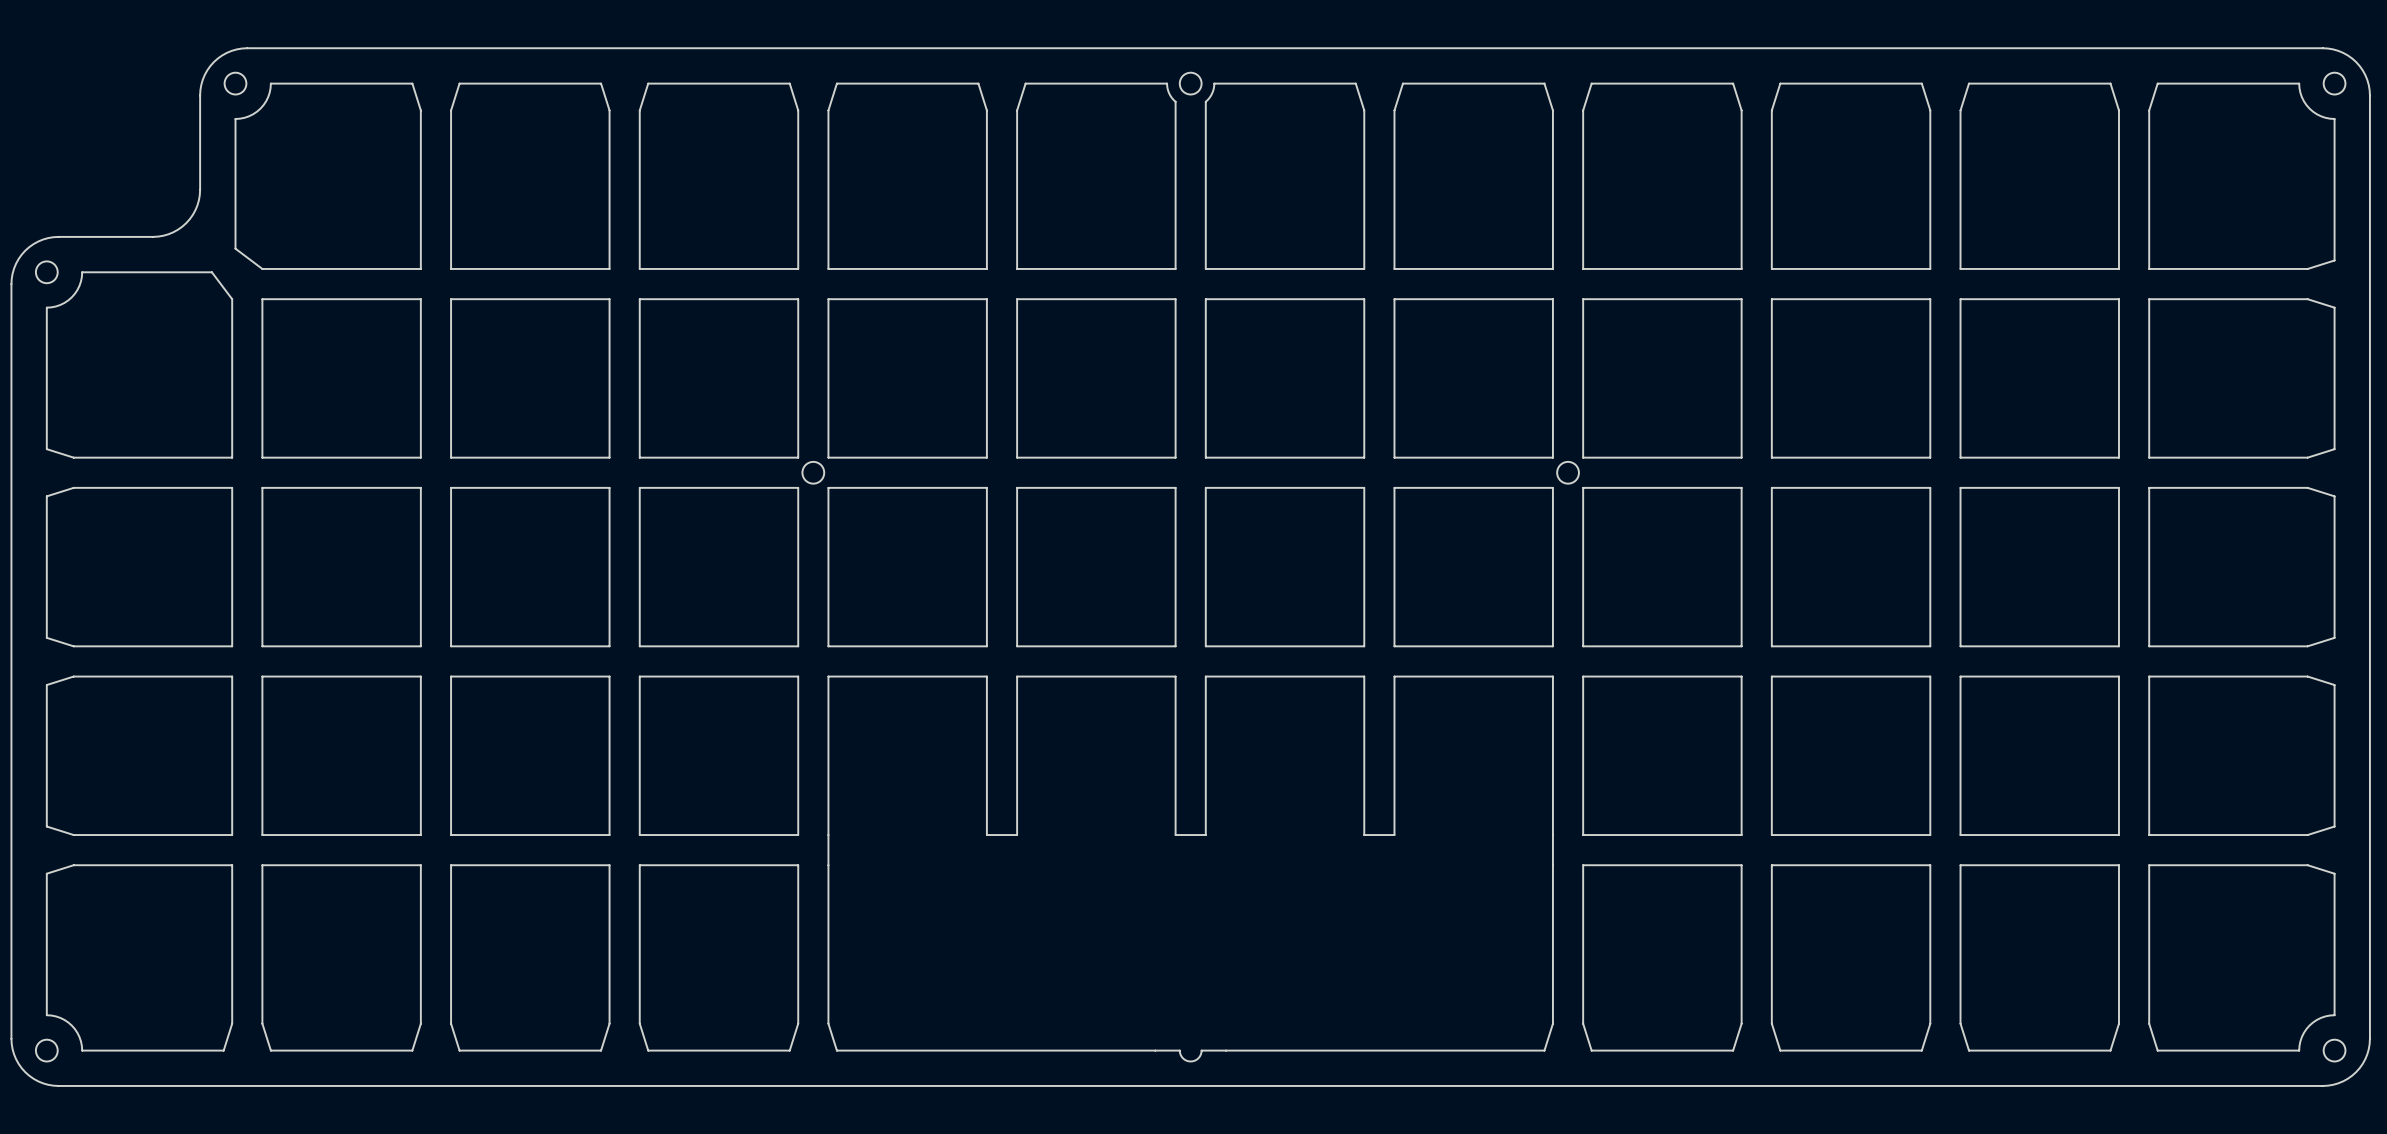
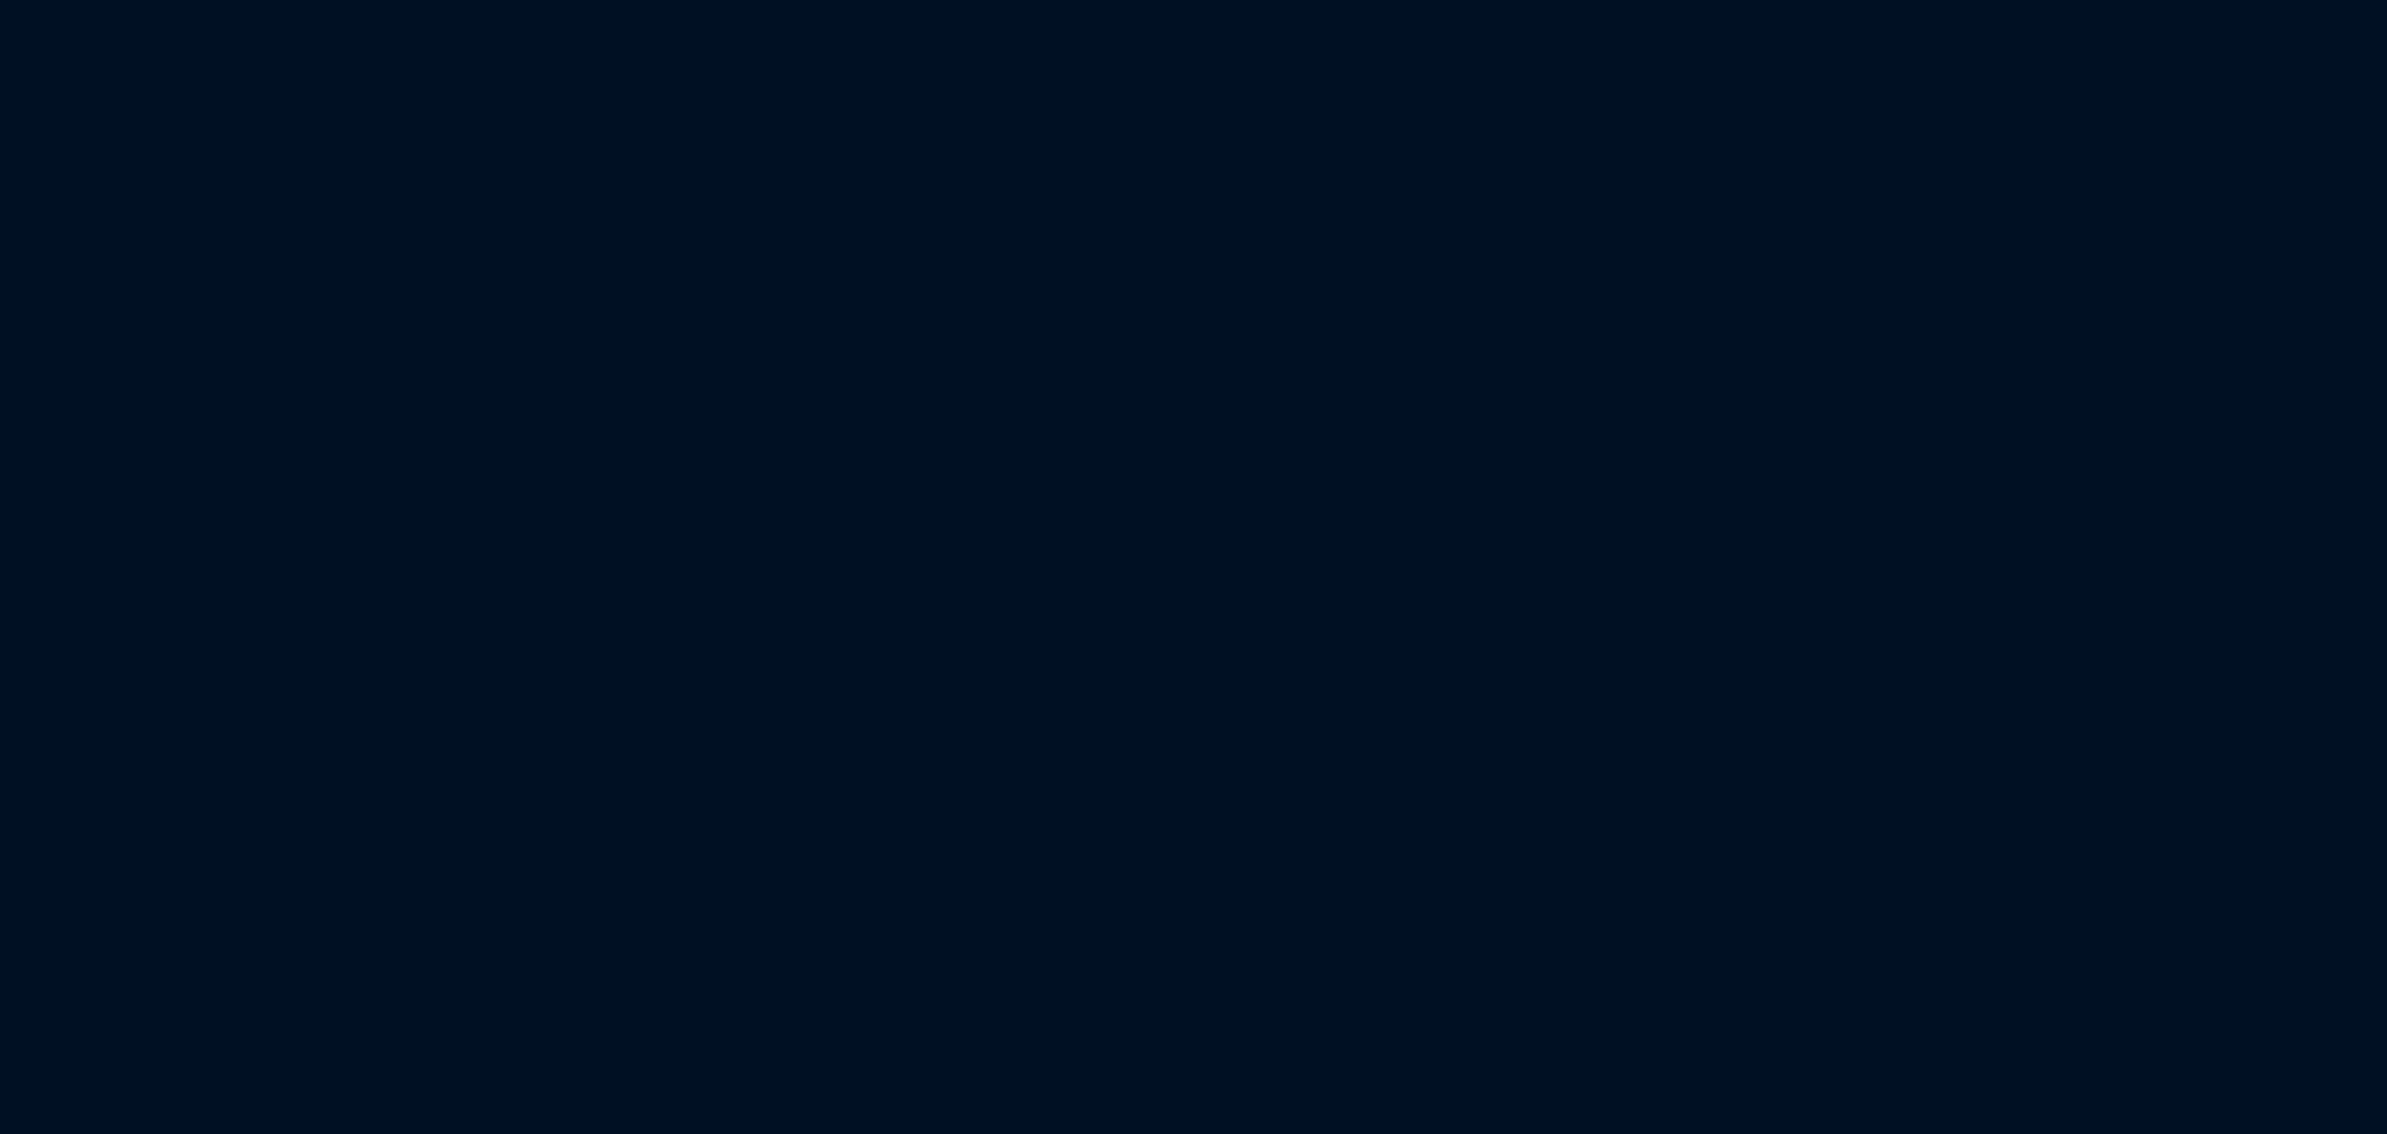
board edge: (2322, 48) (247, 48) (226, 52) (210, 65) (201, 84) (199, 195) (195, 210) (186, 223) (173, 232) (158, 236) (58, 236) (43, 239) (25, 250) (16, 263) (12, 273) (11, 1038) (16, 1059) (25, 1072) (33, 1078) (43, 1083) (58, 1085) (2322, 1085) (2343, 1081) (2356, 1072) (2362, 1063) (2368, 1049) (2369, 1038) (2369, 95) (2367, 79) (2356, 62) (2343, 52) (2322, 48) -> none
round board edge: [224, 72, 247, 95] -> none
round board edge: [1179, 72, 1202, 95] -> none
round board edge: [2323, 72, 2346, 95] -> none
board edge: (412, 83) (270, 83) (268, 97) (260, 108) (249, 116) (235, 118) (235, 248) (262, 268) (420, 268) (420, 110) (412, 83) -> none
board edge: (601, 83) (609, 110) (609, 268) (451, 268) (451, 110) (459, 83) (601, 83) -> none
board edge: (789, 83) (648, 83) (639, 110) (639, 268) (798, 268) (798, 110) (789, 83) -> none
board edge: (978, 83) (836, 83) (828, 110) (828, 268) (986, 268) (986, 110) (978, 83) -> none
board edge: (1167, 83) (1025, 83) (1017, 110) (1017, 268) (1175, 268) (1175, 101) (1169, 93) (1167, 83) -> none
board edge: (1355, 83) (1214, 83) (1212, 93) (1205, 101) (1205, 268) (1364, 268) (1364, 110) (1355, 83) -> none
board edge: (1544, 83) (1402, 83) (1394, 110) (1394, 268) (1552, 268) (1552, 110) (1544, 83) -> none
board edge: (1733, 83) (1591, 83) (1583, 110) (1583, 268) (1741, 268) (1741, 110) (1733, 83) -> none
board edge: (1921, 83) (1780, 83) (1771, 110) (1771, 268) (1930, 268) (1930, 110) (1921, 83) -> none
board edge: (2110, 83) (1969, 83) (1960, 110) (1960, 268) (2118, 268) (2118, 110) (2110, 83) -> none
board edge: (2299, 83) (2157, 83) (2149, 110) (2149, 268) (2307, 268) (2334, 260) (2334, 118) (2321, 116) (2309, 108) (2301, 97) (2299, 83) -> none
round board edge: [35, 261, 58, 284] -> none
board edge: (211, 272) (232, 299) (232, 457) (73, 457) (46, 449) (46, 307) (60, 304) (71, 297) (79, 285) (82, 272) (211, 272) -> none
board edge: (420, 299) (262, 299) (262, 457) (420, 457) (420, 299) -> none
board edge: (609, 299) (451, 299) (451, 457) (609, 457) (609, 299) -> none
board edge: (798, 299) (639, 299) (639, 457) (798, 457) (798, 299) -> none
board edge: (986, 299) (828, 299) (828, 457) (986, 457) (986, 299) -> none
board edge: (1175, 299) (1017, 299) (1017, 457) (1175, 457) (1175, 299) -> none
board edge: (1364, 299) (1205, 299) (1205, 457) (1364, 457) (1364, 299) -> none
board edge: (1552, 299) (1394, 299) (1394, 457) (1552, 457) (1552, 299) -> none
board edge: (1741, 299) (1583, 299) (1583, 457) (1741, 457) (1741, 299) -> none
board edge: (1930, 299) (1771, 299) (1771, 457) (1930, 457) (1930, 299) -> none
board edge: (2118, 299) (1960, 299) (1960, 457) (2118, 457) (2118, 299) -> none
board edge: (2307, 299) (2149, 299) (2149, 457) (2307, 457) (2334, 449) (2334, 307) (2307, 299) -> none
round board edge: [802, 461, 825, 484] -> none
round board edge: [1556, 461, 1580, 484] -> none
board edge: (232, 487) (73, 487) (46, 496) (46, 637) (73, 646) (232, 646) (232, 487) -> none
board edge: (420, 487) (262, 487) (262, 646) (420, 646) (420, 487) -> none
board edge: (609, 487) (609, 646) (451, 646) (451, 487) (609, 487) -> none
board edge: (798, 487) (639, 487) (639, 646) (798, 646) (798, 487) -> none
board edge: (986, 487) (828, 487) (828, 646) (986, 646) (986, 487) -> none
board edge: (1175, 487) (1017, 487) (1017, 646) (1175, 646) (1175, 487) -> none
board edge: (1364, 487) (1205, 487) (1205, 646) (1364, 646) (1364, 487) -> none
board edge: (1552, 487) (1394, 487) (1394, 646) (1552, 646) (1552, 487) -> none
board edge: (1741, 487) (1583, 487) (1583, 646) (1741, 646) (1741, 487) -> none
board edge: (1930, 487) (1771, 487) (1771, 646) (1930, 646) (1930, 487) -> none
board edge: (2118, 487) (1960, 487) (1960, 646) (2118, 646) (2118, 487) -> none
board edge: (2307, 487) (2149, 487) (2149, 646) (2307, 646) (2334, 637) (2334, 496) (2307, 487) -> none
board edge: (232, 676) (73, 676) (46, 685) (46, 826) (73, 835) (232, 835) (232, 676) -> none
board edge: (420, 676) (262, 676) (262, 835) (420, 835) (420, 676) -> none
board edge: (609, 676) (451, 676) (451, 835) (609, 835) (609, 676) -> none
board edge: (798, 676) (639, 676) (639, 835) (798, 835) (798, 676) -> none
board edge: (1552, 676) (1394, 676) (1394, 835) (1364, 835) (1364, 676) (1205, 676) (1205, 835) (1175, 835) (1175, 676) (1017, 676) (1017, 835) (986, 835) (986, 676) (828, 676) (828, 1023) (836, 1050) (1179, 1050) (1182, 1058) (1190, 1061) (1198, 1058) (1201, 1050) (1544, 1050) (1552, 1023) (1552, 676) -> none
board edge: (1741, 676) (1583, 676) (1583, 835) (1741, 835) (1741, 676) -> none
board edge: (1930, 676) (1771, 676) (1771, 835) (1930, 835) (1930, 676) -> none
board edge: (2118, 676) (1960, 676) (1960, 835) (2118, 835) (2118, 676) -> none
board edge: (2307, 676) (2149, 676) (2149, 835) (2307, 835) (2334, 826) (2334, 685) (2307, 676) -> none
board edge: (232, 865) (73, 865) (46, 873) (46, 1015) (60, 1017) (71, 1025) (79, 1037) (82, 1050) (223, 1050) (232, 1023) (232, 865) -> none
board edge: (420, 865) (262, 865) (262, 1023) (270, 1050) (412, 1050) (420, 1023) (420, 865) -> none
board edge: (609, 865) (451, 865) (451, 1023) (459, 1050) (601, 1050) (609, 1023) (609, 865) -> none
board edge: (798, 865) (639, 865) (639, 1023) (648, 1050) (789, 1050) (798, 1023) (798, 865) -> none
board edge: (1741, 865) (1583, 865) (1583, 1023) (1591, 1050) (1733, 1050) (1741, 1023) (1741, 865) -> none
board edge: (1930, 865) (1771, 865) (1771, 1023) (1780, 1050) (1921, 1050) (1930, 1023) (1930, 865) -> none
board edge: (2118, 865) (1960, 865) (1960, 1023) (1969, 1050) (2110, 1050) (2118, 1023) (2118, 865) -> none
board edge: (2307, 865) (2149, 865) (2149, 1023) (2157, 1050) (2299, 1050) (2301, 1037) (2309, 1025) (2321, 1017) (2334, 1015) (2334, 873) (2307, 865) -> none
round board edge: [35, 1039, 58, 1062] -> none
round board edge: [2323, 1039, 2346, 1062] -> none

